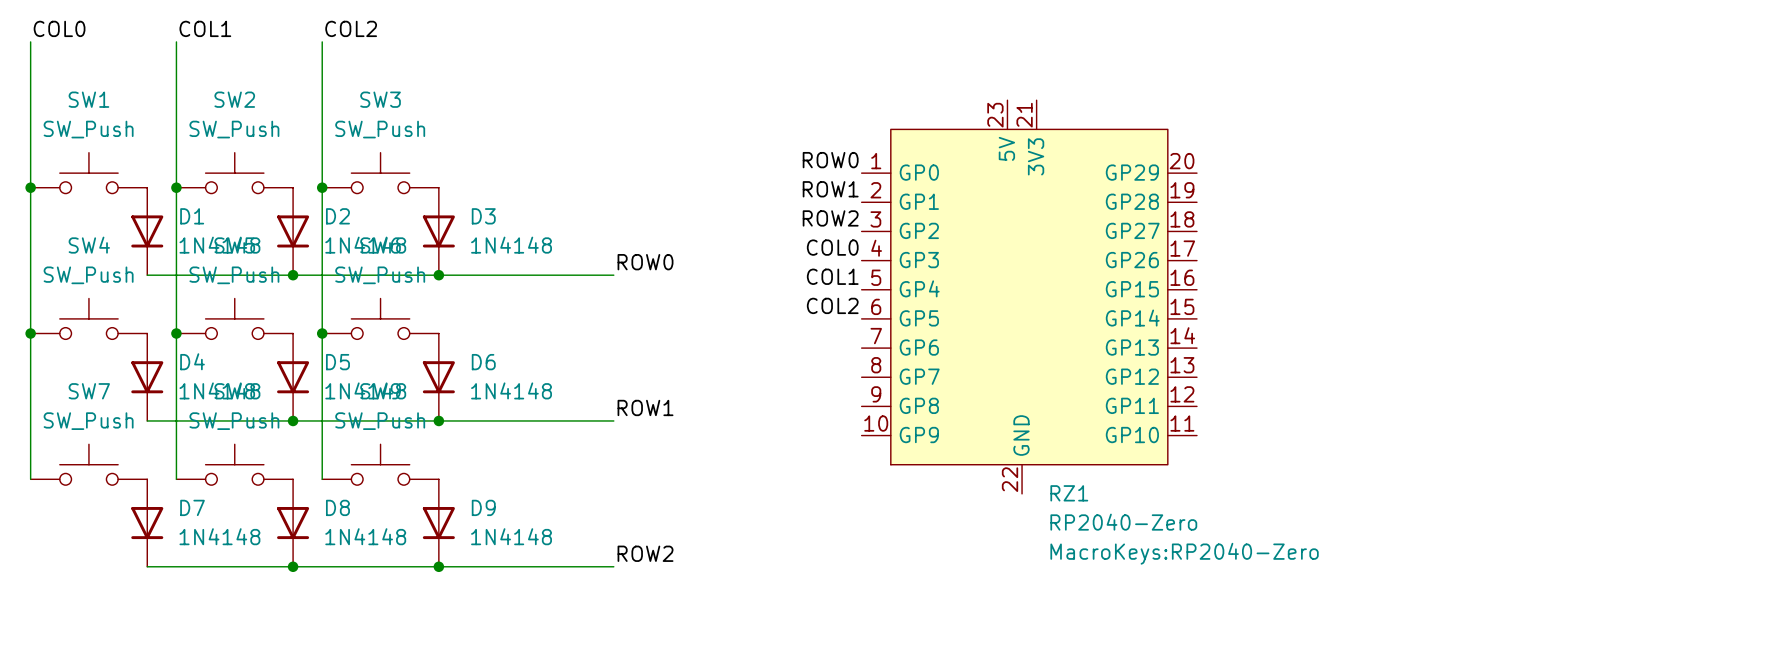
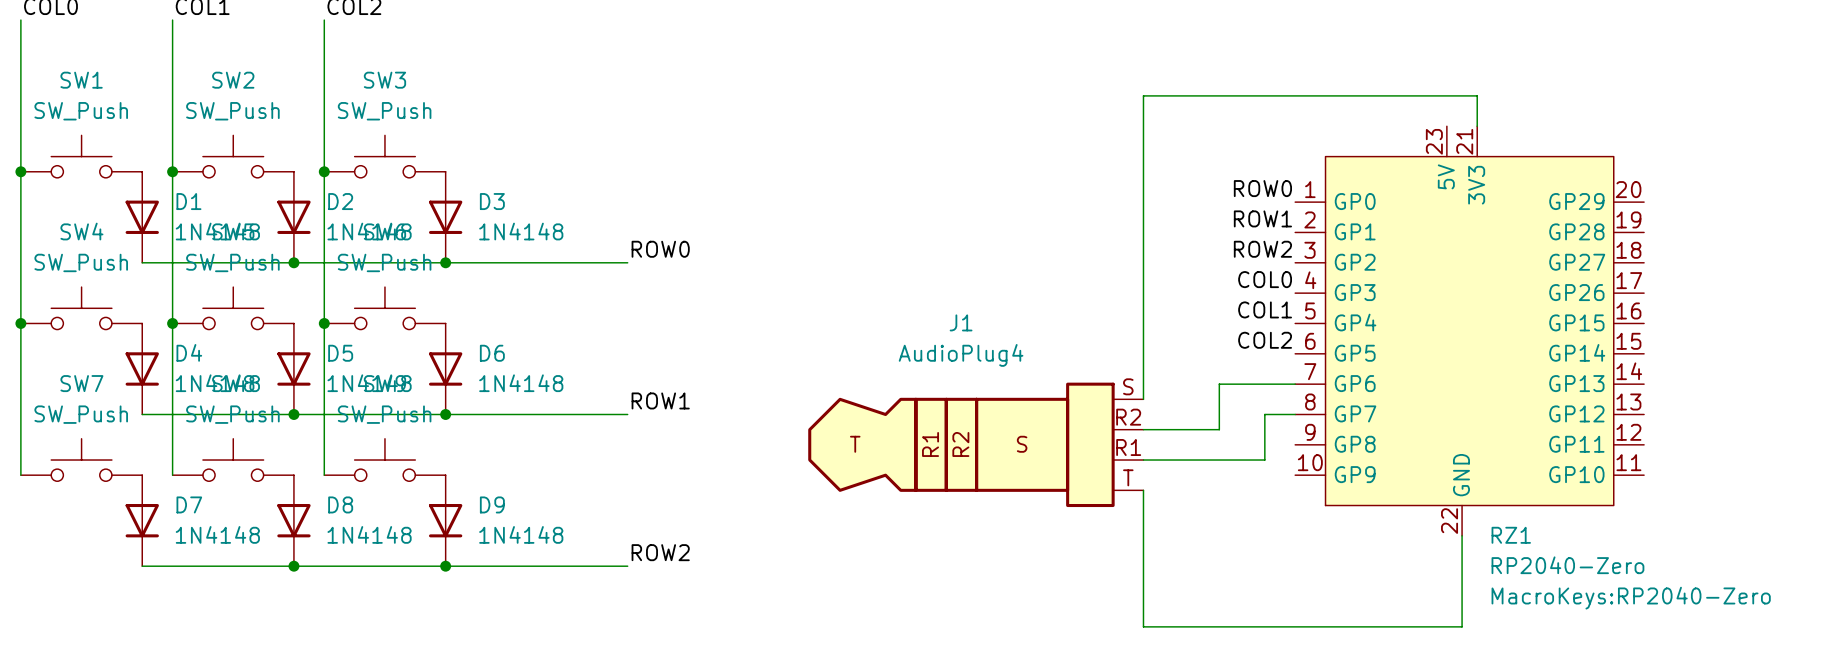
wire: none -> (1477, 126) (1477, 95) (1143, 95) (1143, 399)
label: ROW0 (830, 160) -> none
label: ROW1 (830, 189) -> none
label: none -> ROW0 (1262, 188)
label: ROW2 (830, 218) -> none
label: none -> ROW1 (1262, 218)
label: COL0 (832, 247) -> none
label: none -> ROW2 (1262, 249)
label: COL1 (832, 276) -> none
label: none -> COL0 (1265, 279)
RZ1 position: (1029, 297) -> (1469, 331)
label: COL2 (832, 305) -> none
label: none -> COL1 (1265, 309)
label: none -> COL2 (1265, 340)
wire: none -> (1295, 384) (1219, 384) (1219, 429) (1143, 429)
wire: none -> (1295, 414) (1264, 414) (1264, 460) (1143, 460)
J1: none -> AudioPlug4 (975, 444)
wire: none -> (1143, 490) (1143, 626) (1462, 626) (1462, 535)

